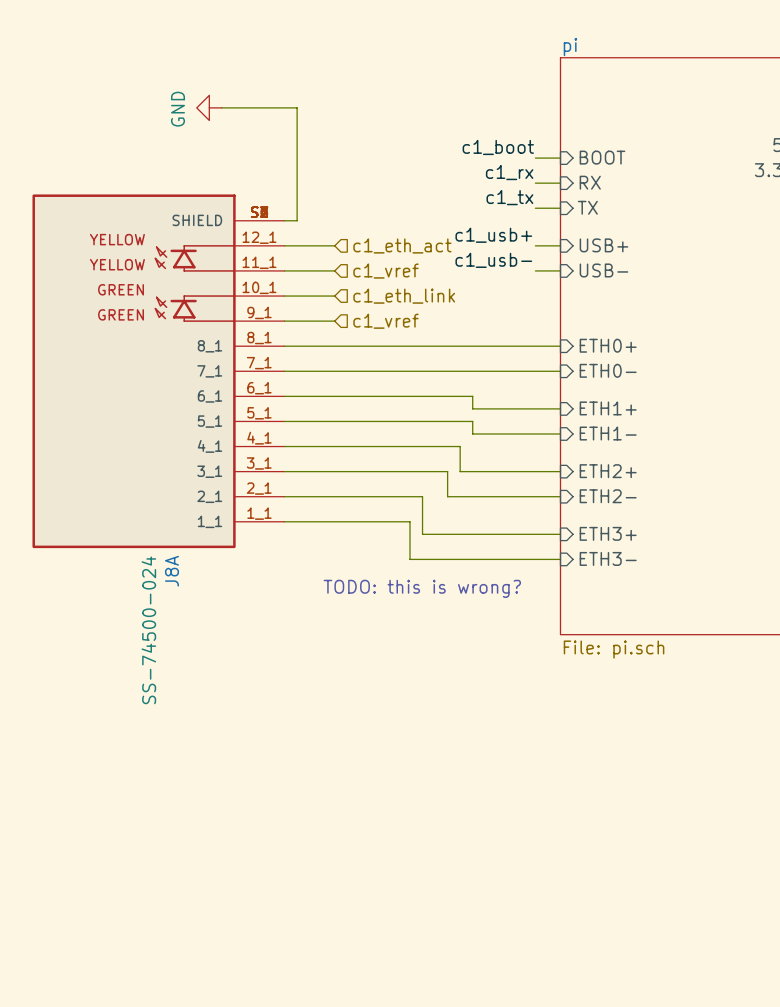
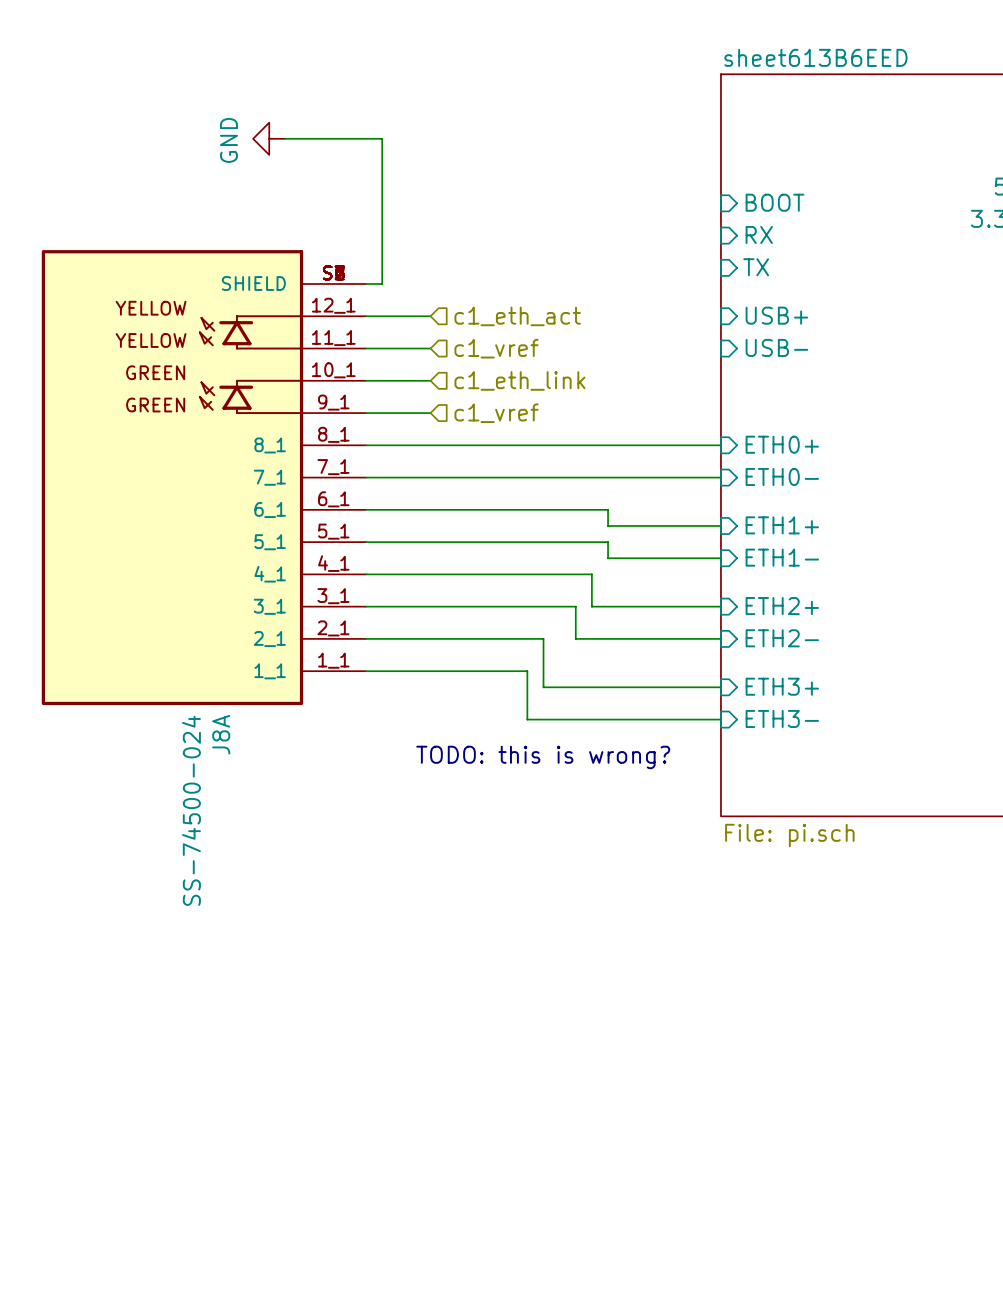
sheet pi name: pi (570, 47) -> sheet613B6EED (815, 57)
label: c1_boot (498, 147) -> none
wire: (535, 158) (560, 158) -> none
label: c1_rx (509, 172) -> none
wire: (535, 183) (560, 183) -> none
label: c1_tx (509, 197) -> none
wire: (535, 208) (560, 208) -> none
label: c1_usb+ (493, 235) -> none
wire: (535, 245) (560, 245) -> none
label: c1_usb- (493, 260) -> none
wire: (535, 270) (560, 270) -> none

